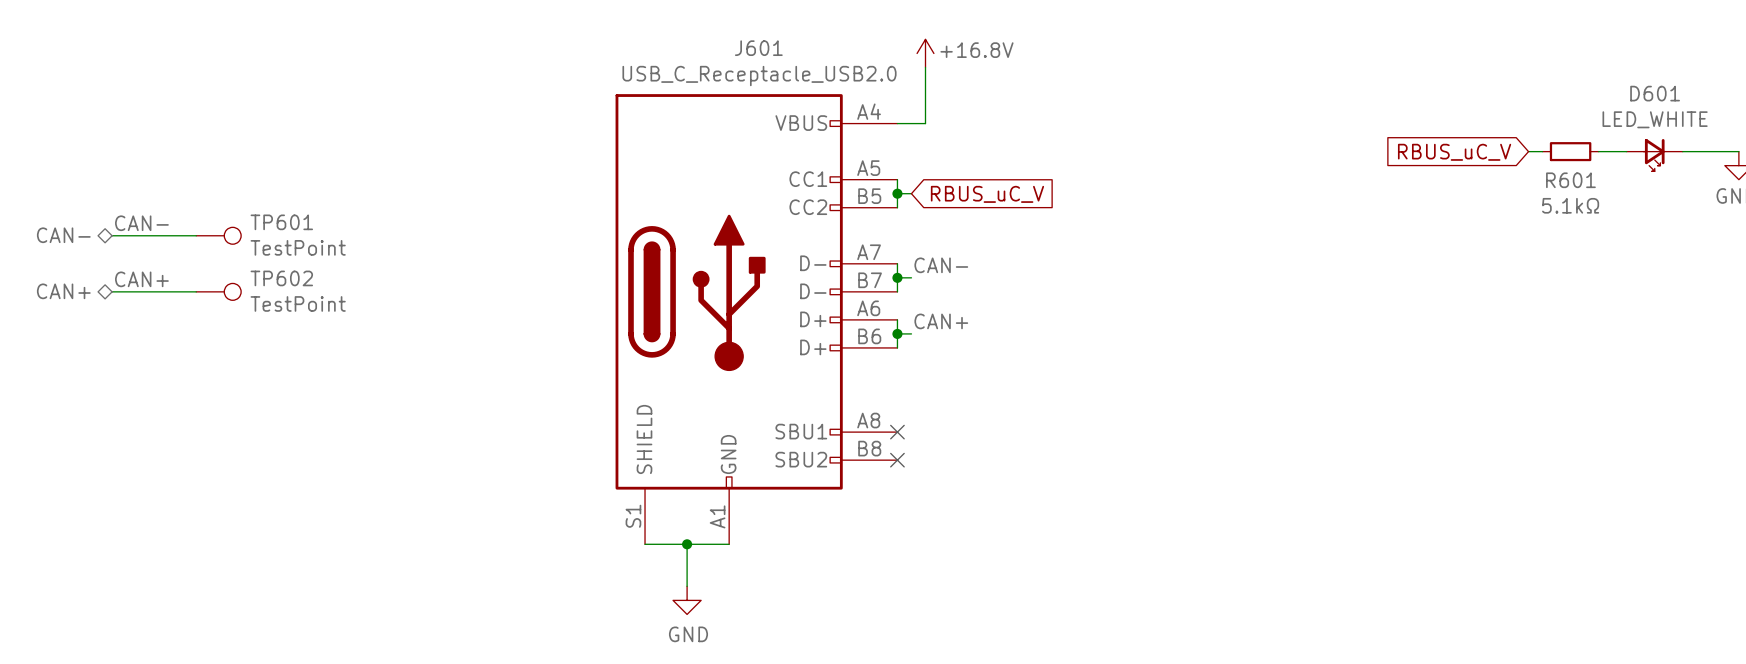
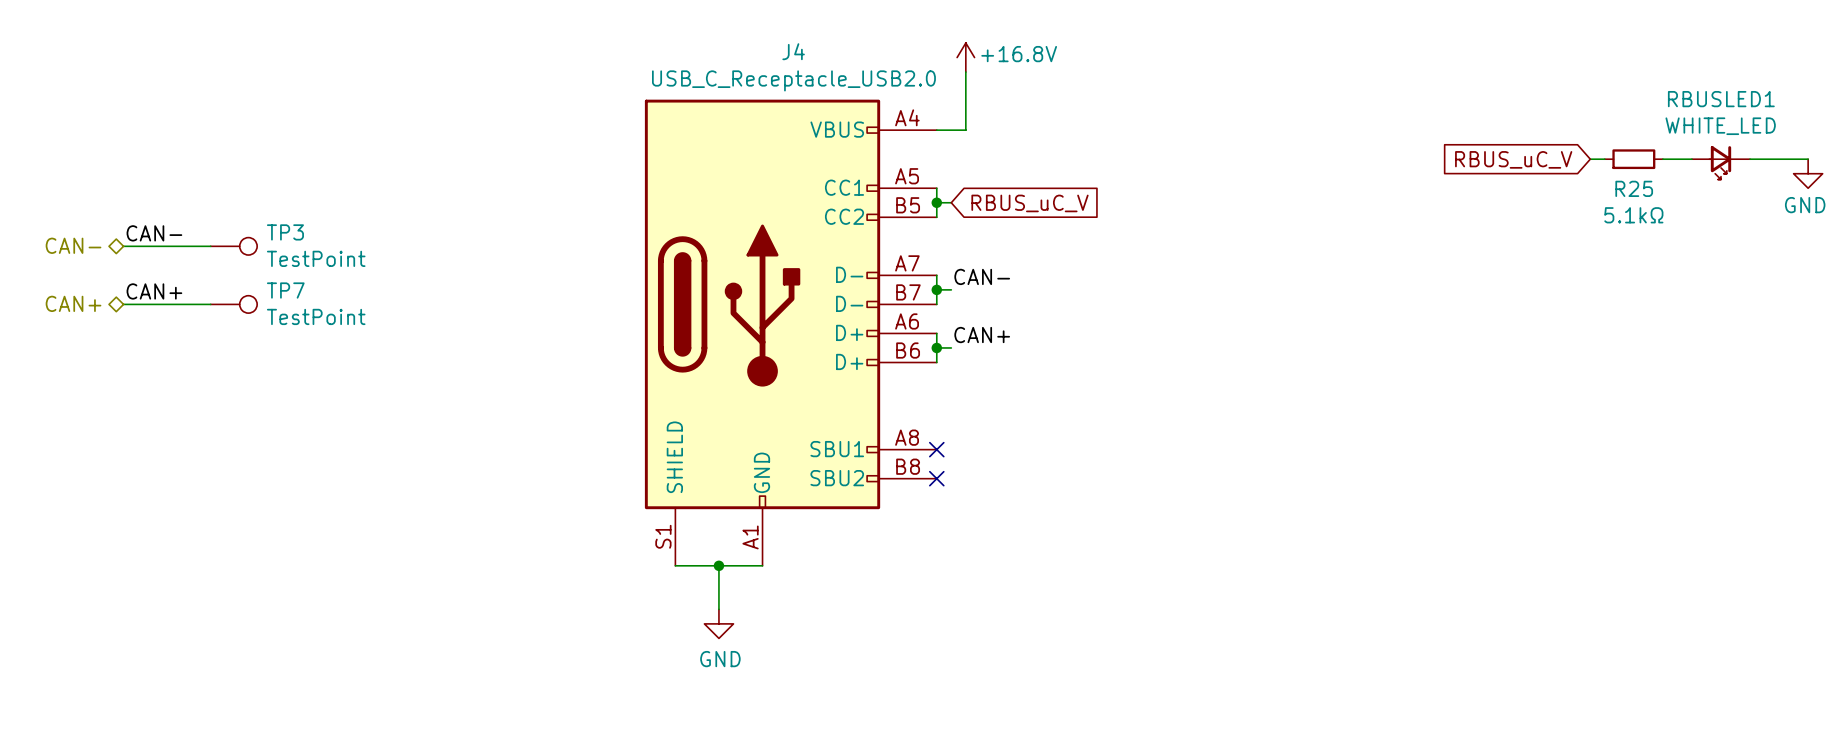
J601 name: J601 (758, 48) -> J4 (793, 51)
D601 name: D601 (1655, 93) -> RBUSLED1 (1721, 99)
D601 value: LED_WHITE (1655, 119) -> WHITE_LED (1720, 126)
R601 name: R601 (1570, 180) -> R25 (1634, 188)
TP601 name: TP601 (281, 222) -> TP3 (285, 232)
TP602 name: TP602 (281, 278) -> TP7 (285, 290)

